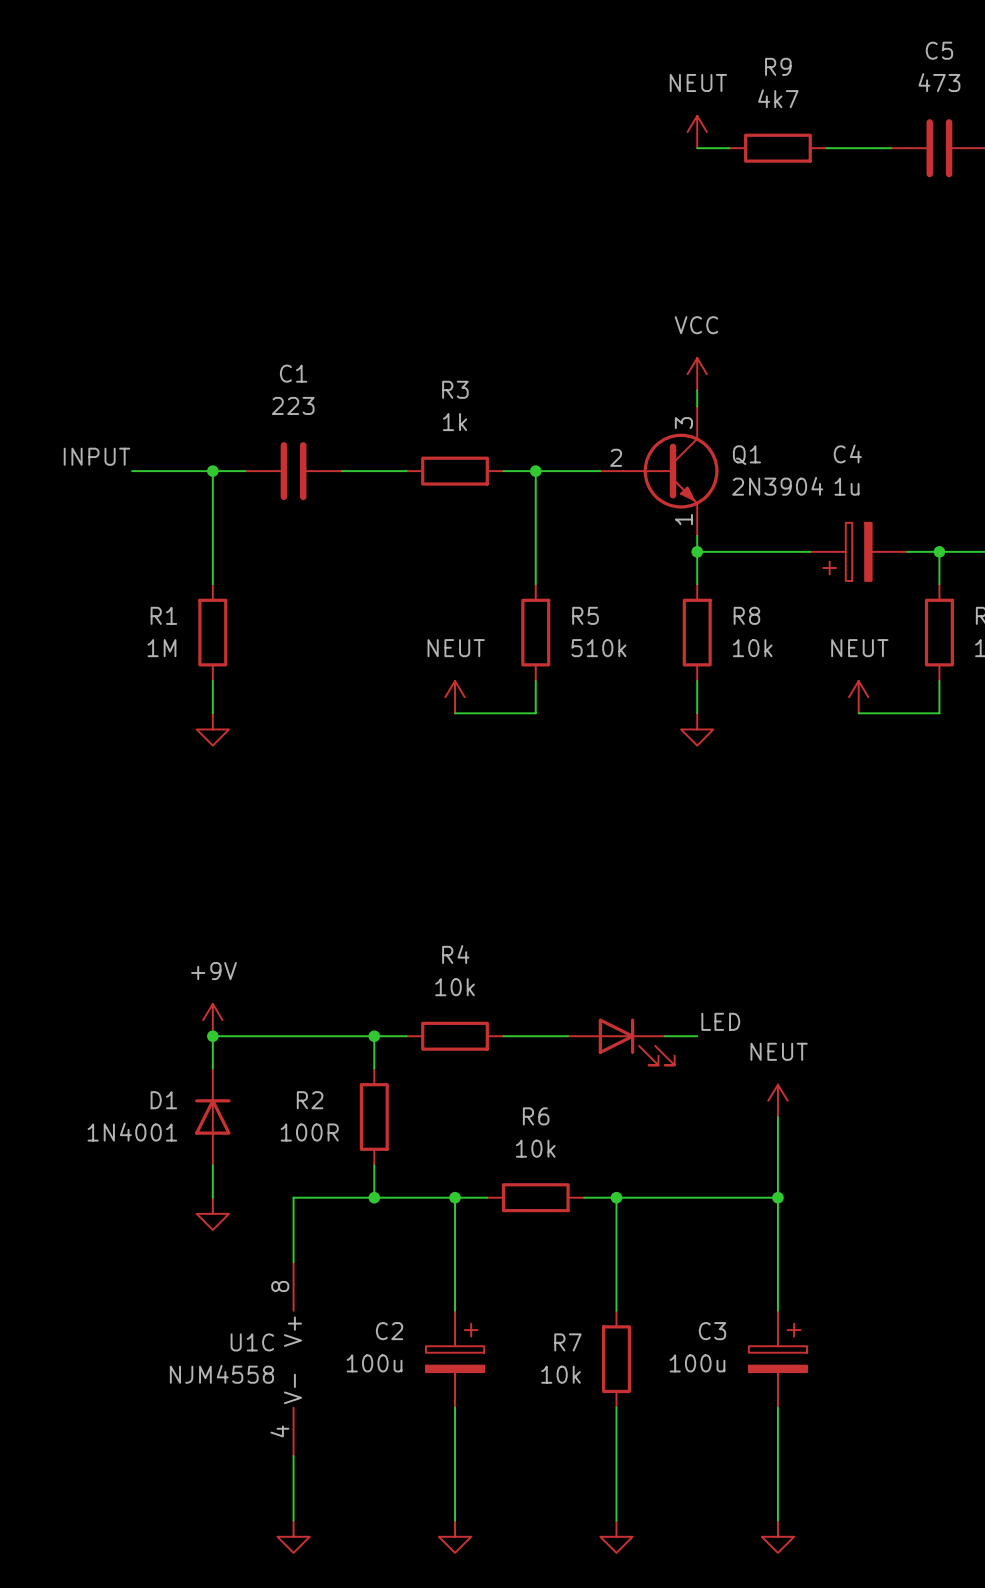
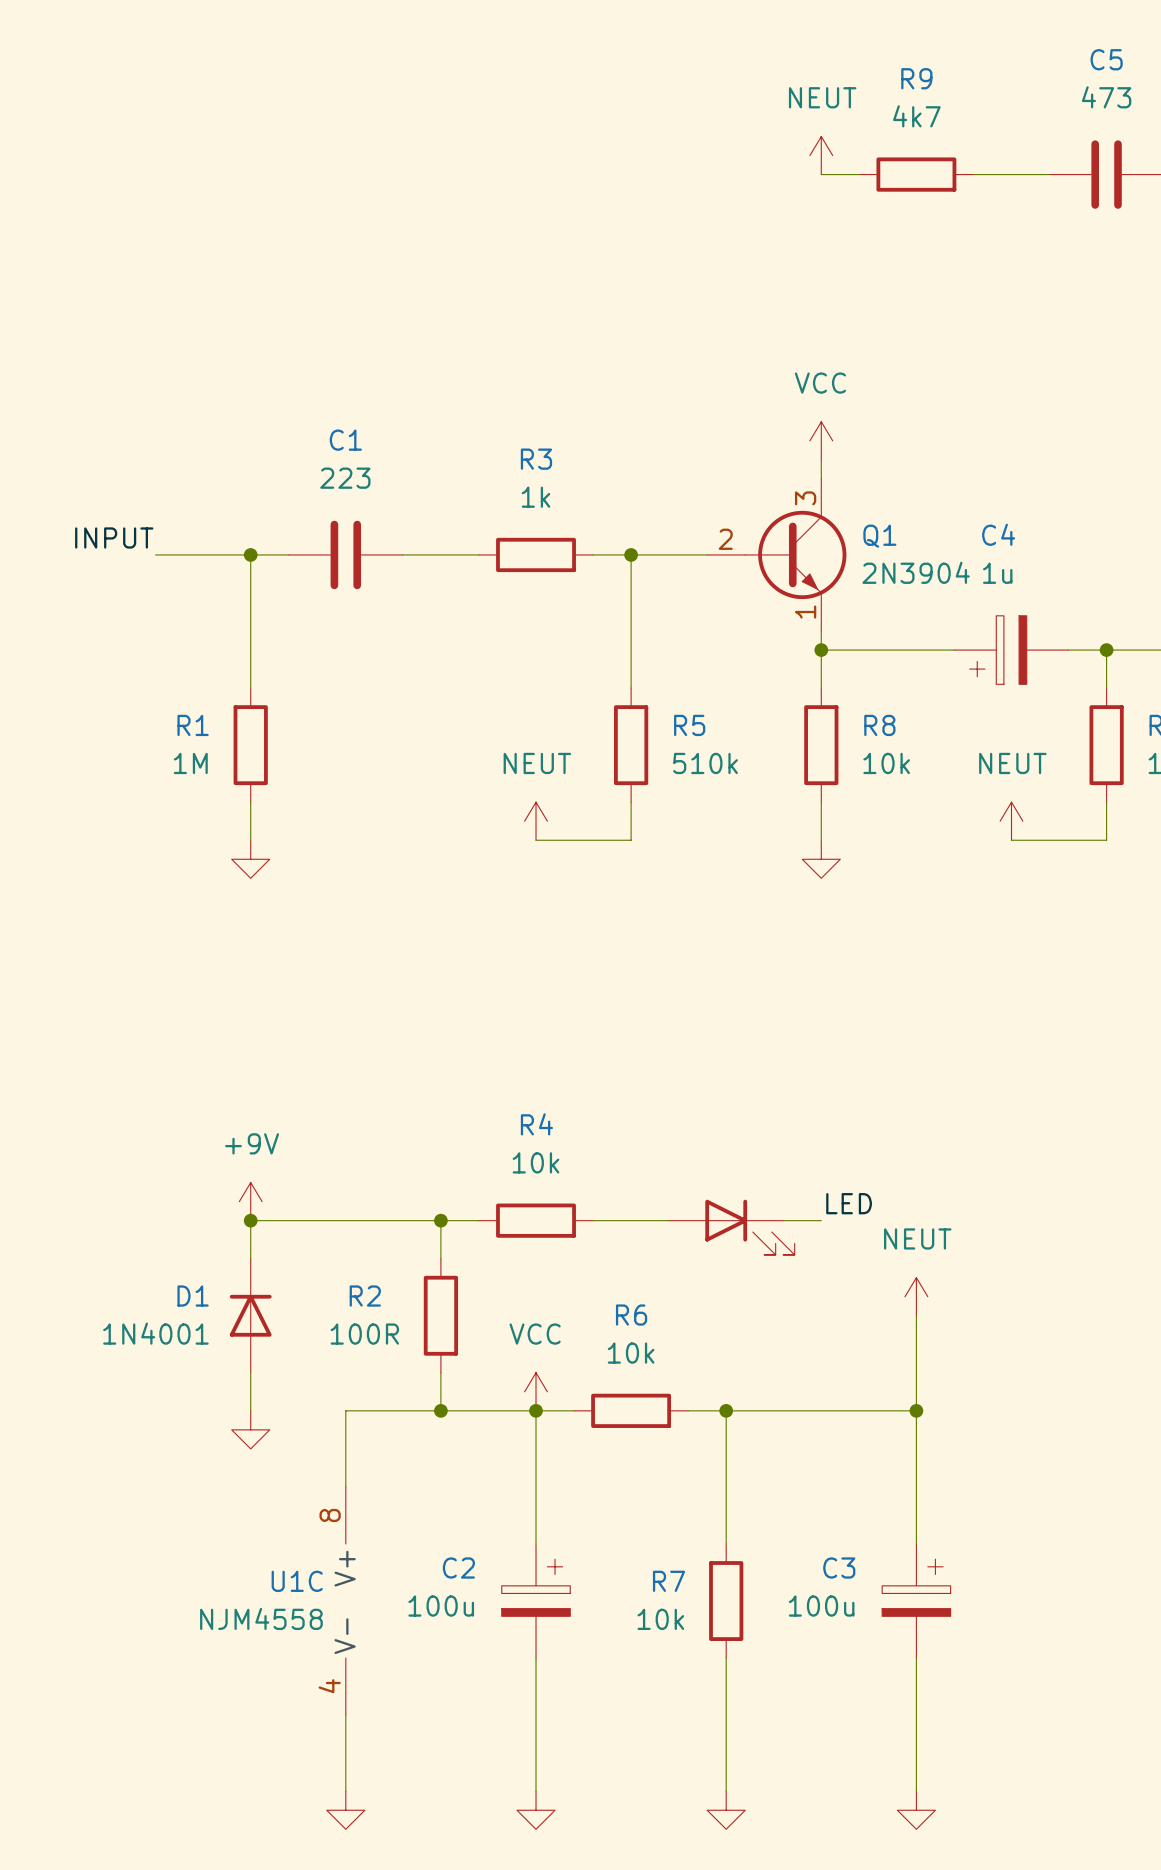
power symbol: none -> VCC (536, 1391)

